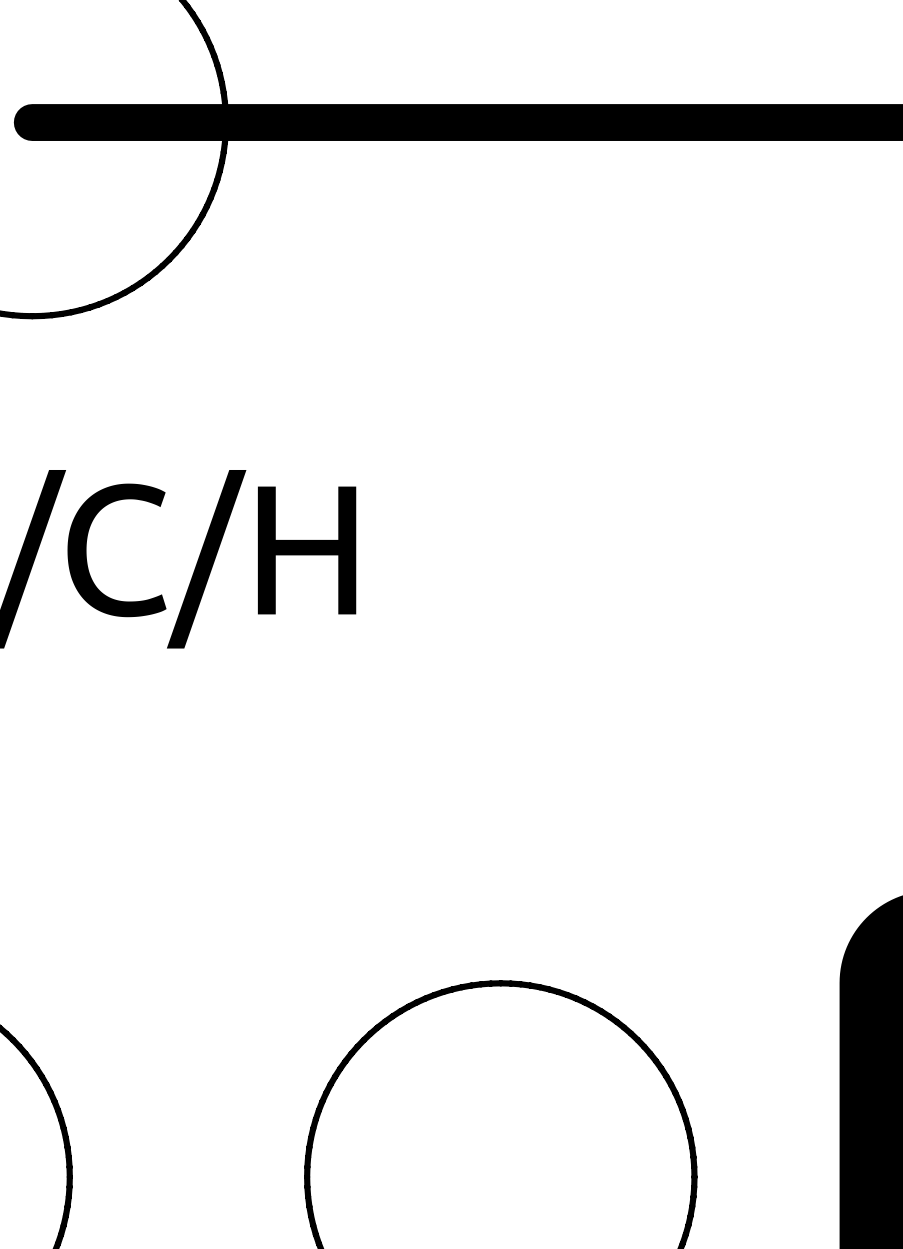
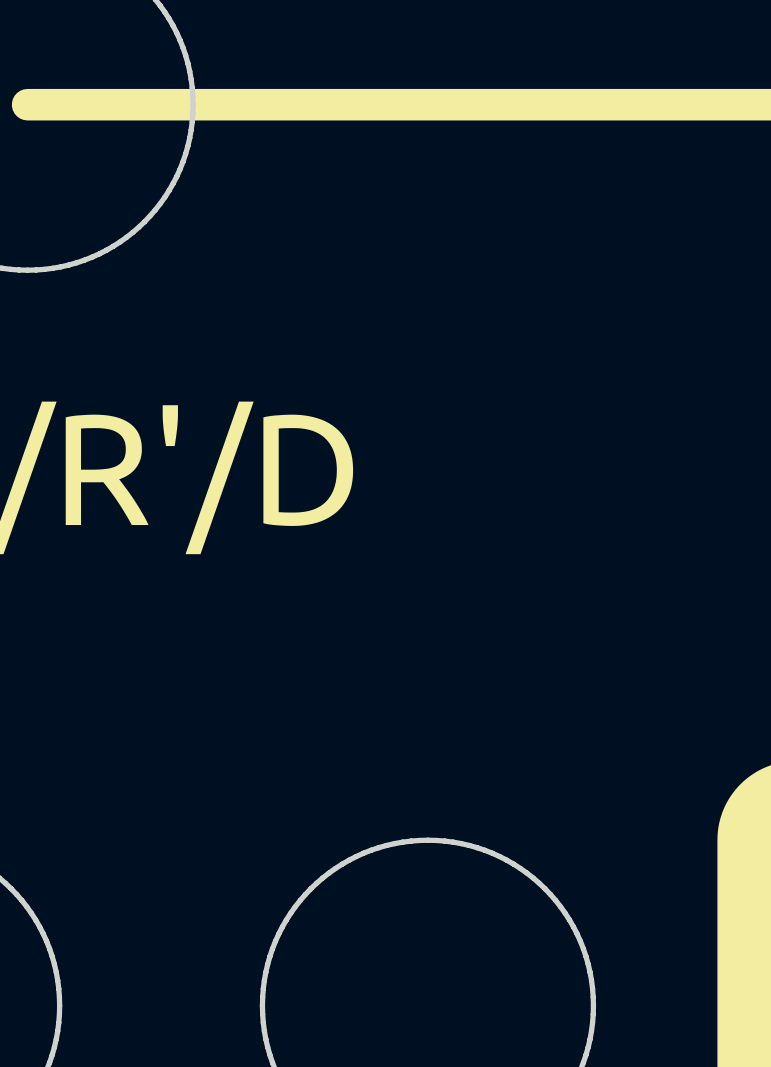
drawing: none -> [162, 405, 178, 447]
drawing shape: [67, 483, 167, 618] -> [65, 414, 149, 526]
drawing shape: [257, 486, 357, 615] -> [263, 414, 354, 526]
drawing position: (206, 559) -> (219, 477)

